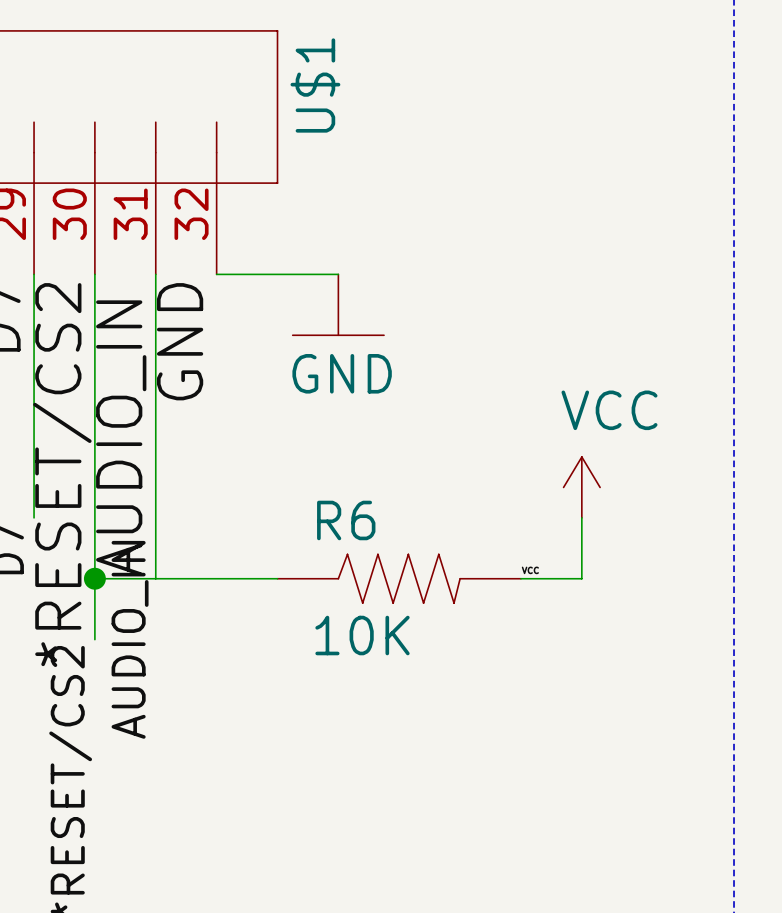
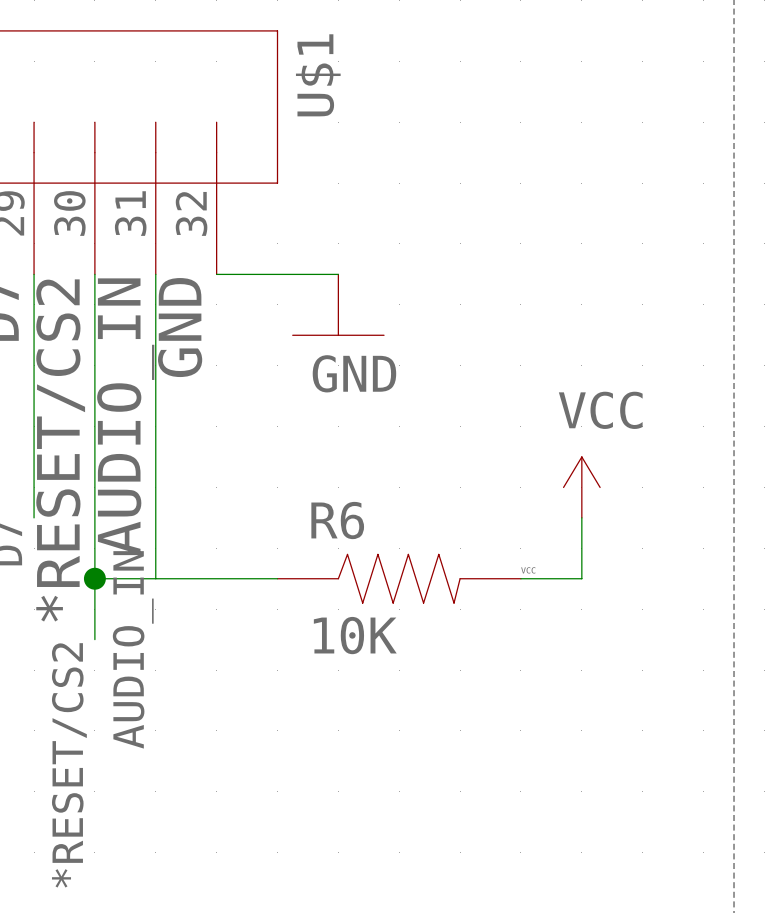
label position: AUDIO_IN (121, 438) -> AUDIO_IN (125, 416)
label position: AUDIO_IN (130, 639) -> AUDIO_IN (133, 649)

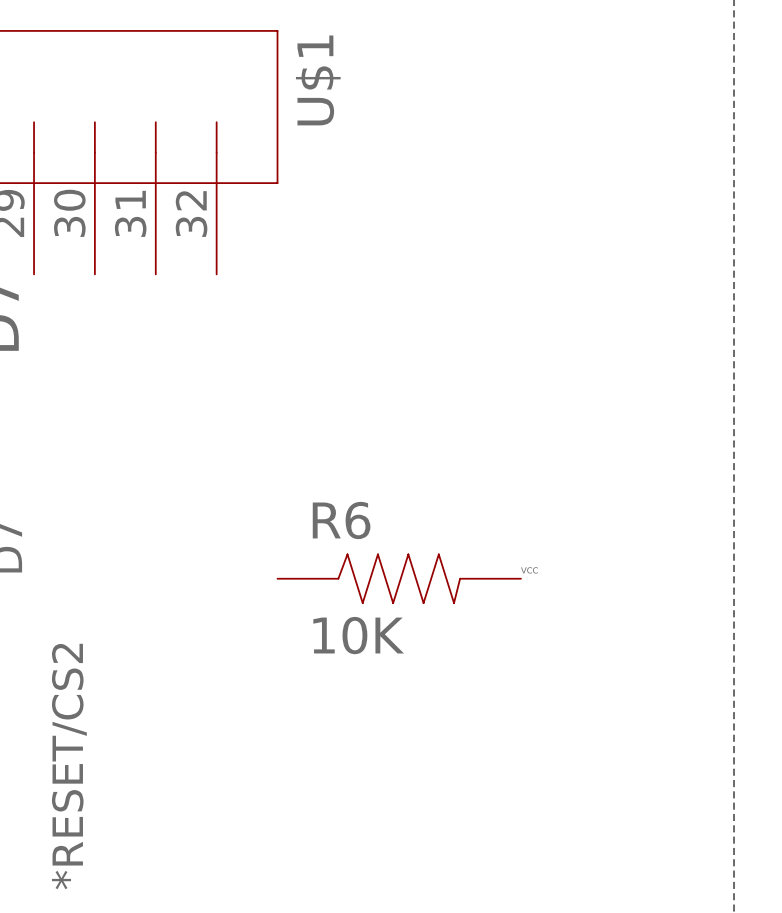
wire: (34, 274) (34, 517) -> none
wire: (94, 274) (94, 639) -> none
wire: (155, 274) (155, 578) -> none
wire: (216, 274) (338, 274) -> none
power symbol: GND (338, 304) -> none
label: GND (180, 327) -> none
label: AUDIO_IN (125, 416) -> none
label: *RESET/CS2 (60, 450) -> none
power symbol: VCC (581, 487) -> none
wire: (581, 517) (581, 578) (520, 578) -> none
wire: (94, 578) (277, 578) -> none
junction: (94, 578) -> none
label: AUDIO_IN (133, 649) -> none

